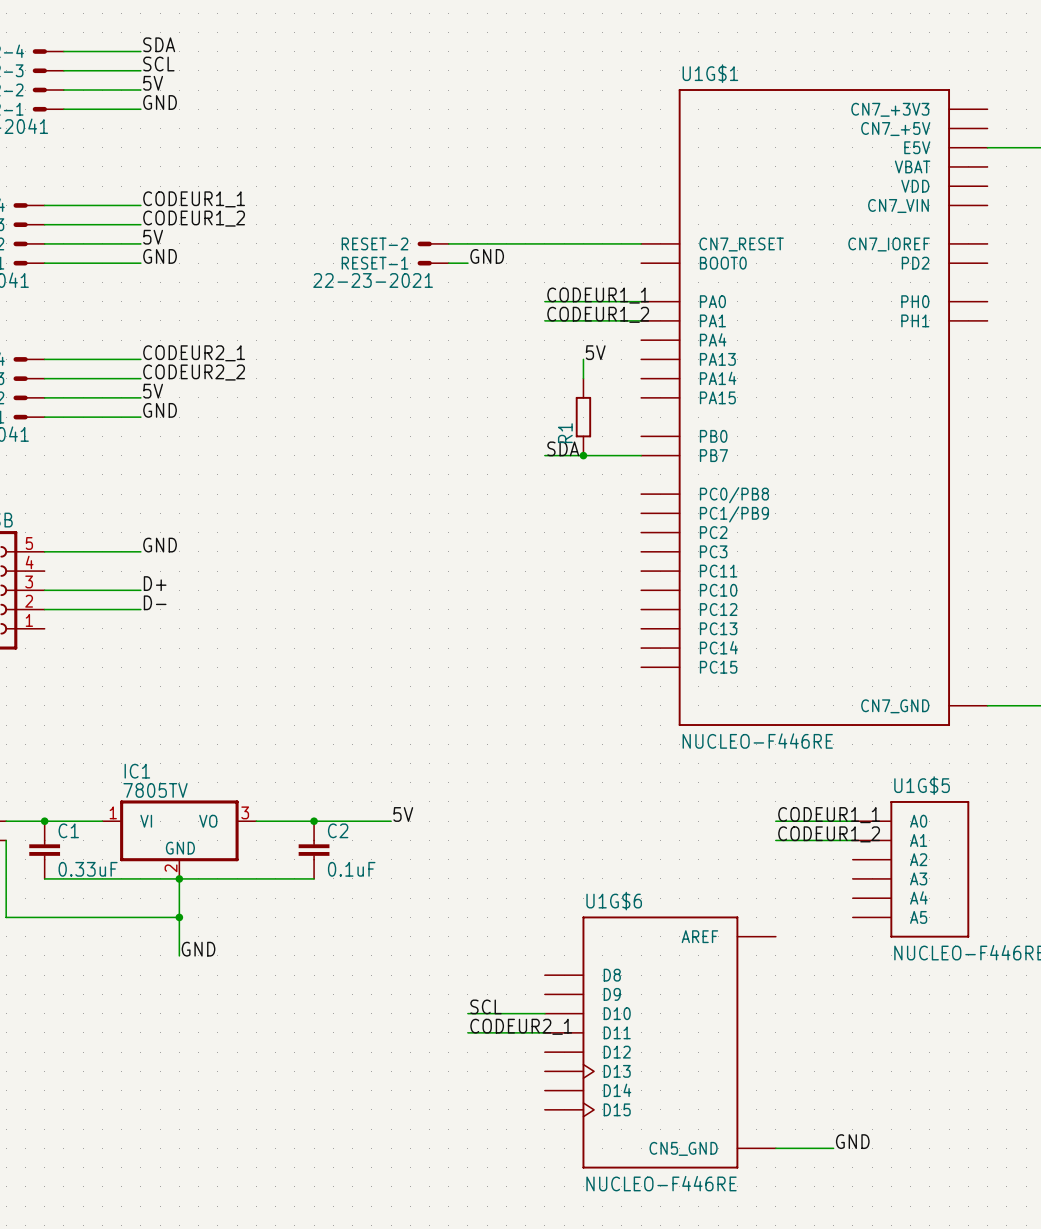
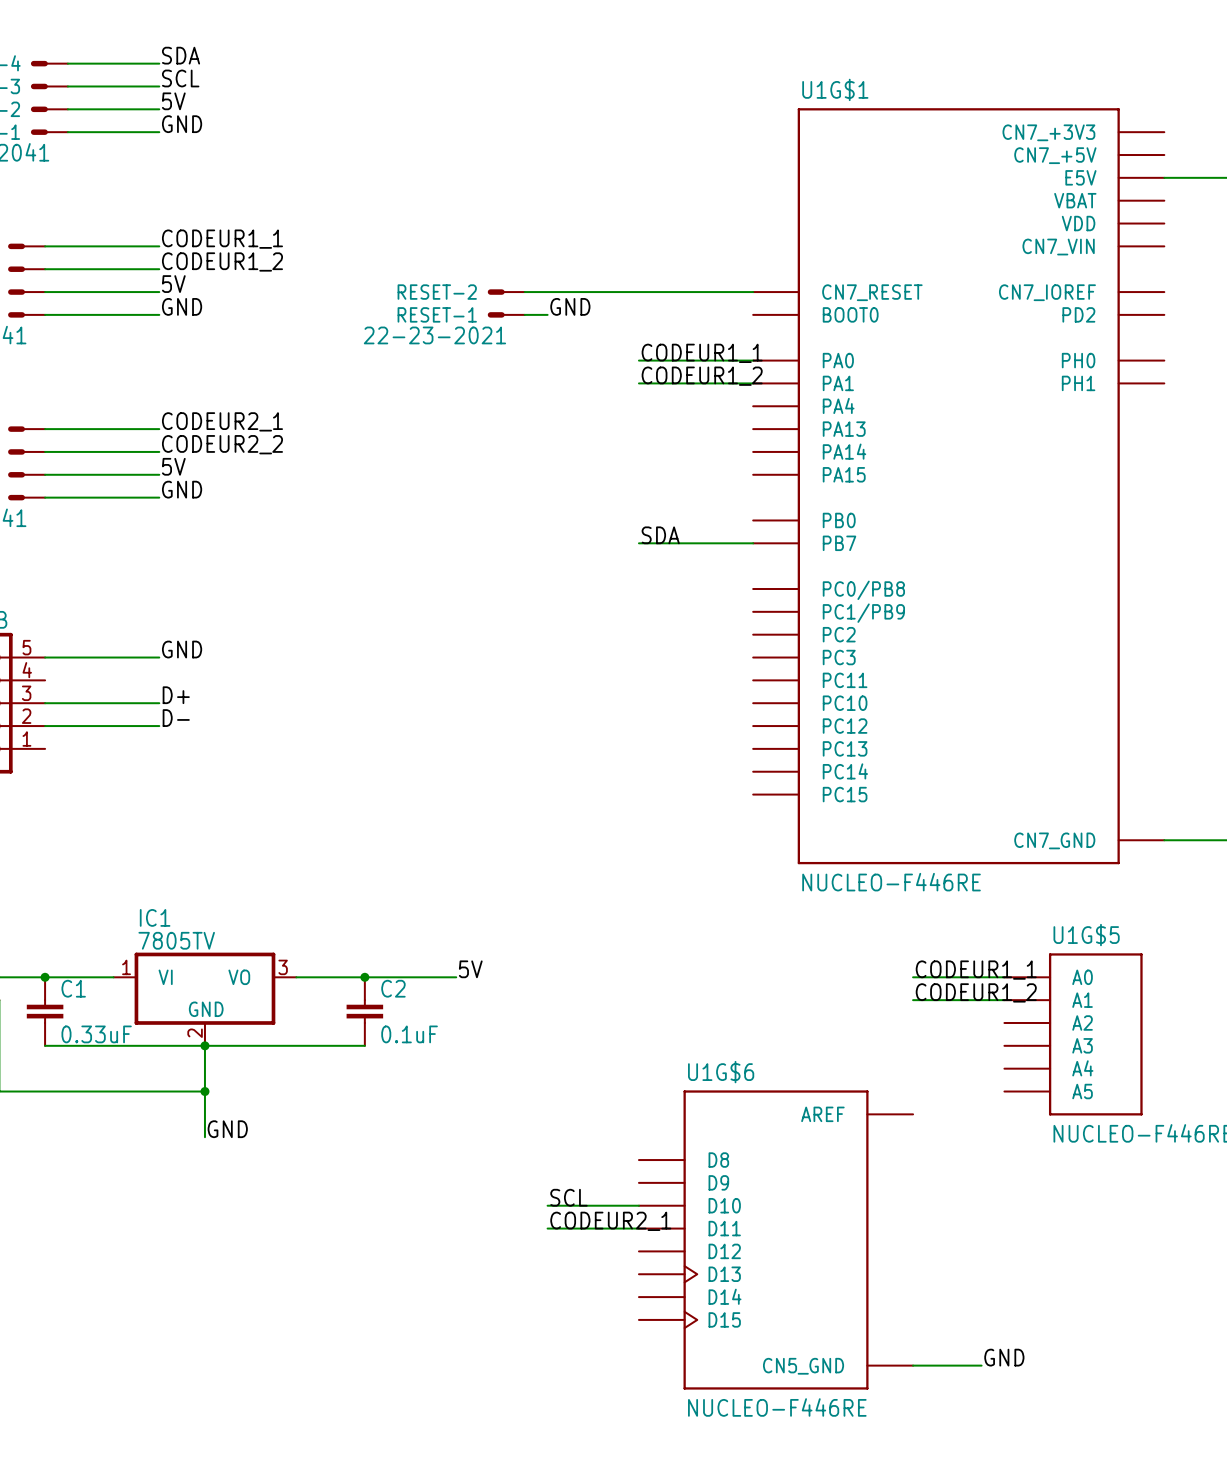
label: 5V (595, 352) -> none
wire: (583, 359) (583, 378) -> none
R1: (583, 417) -> none
junction: (583, 455) -> none

